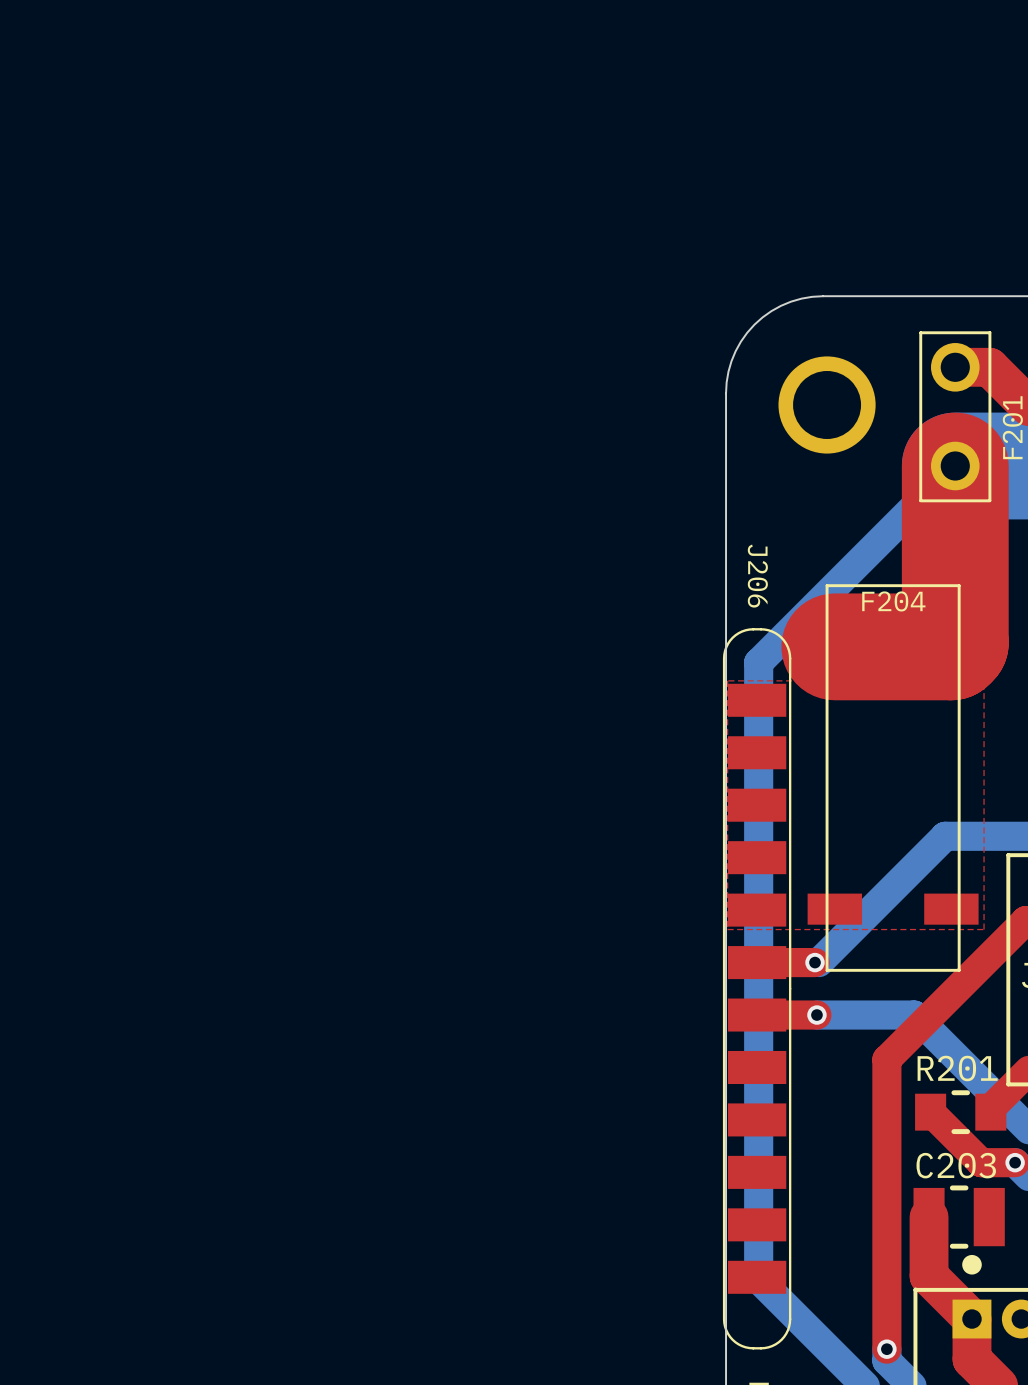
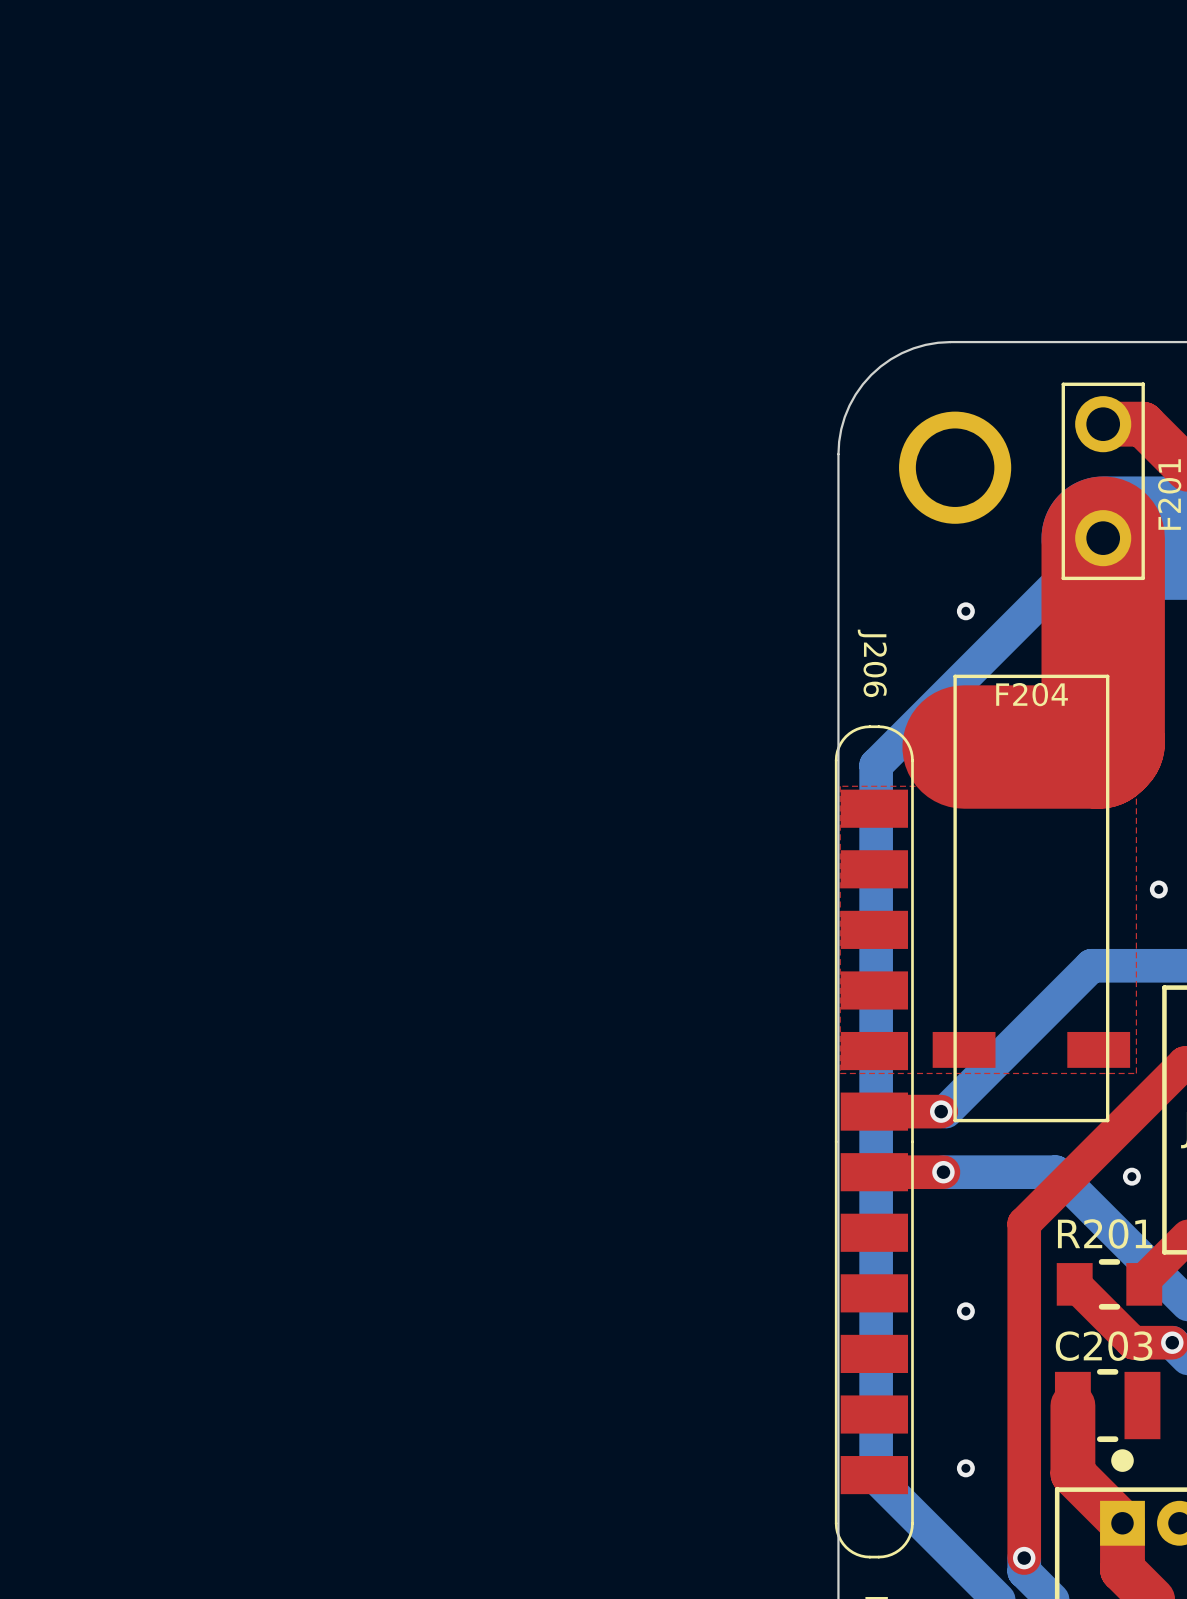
via: none -> (965, 611)
via: none -> (1158, 889)
via: none -> (1131, 1176)
via: none -> (965, 1311)
via: none -> (965, 1468)

